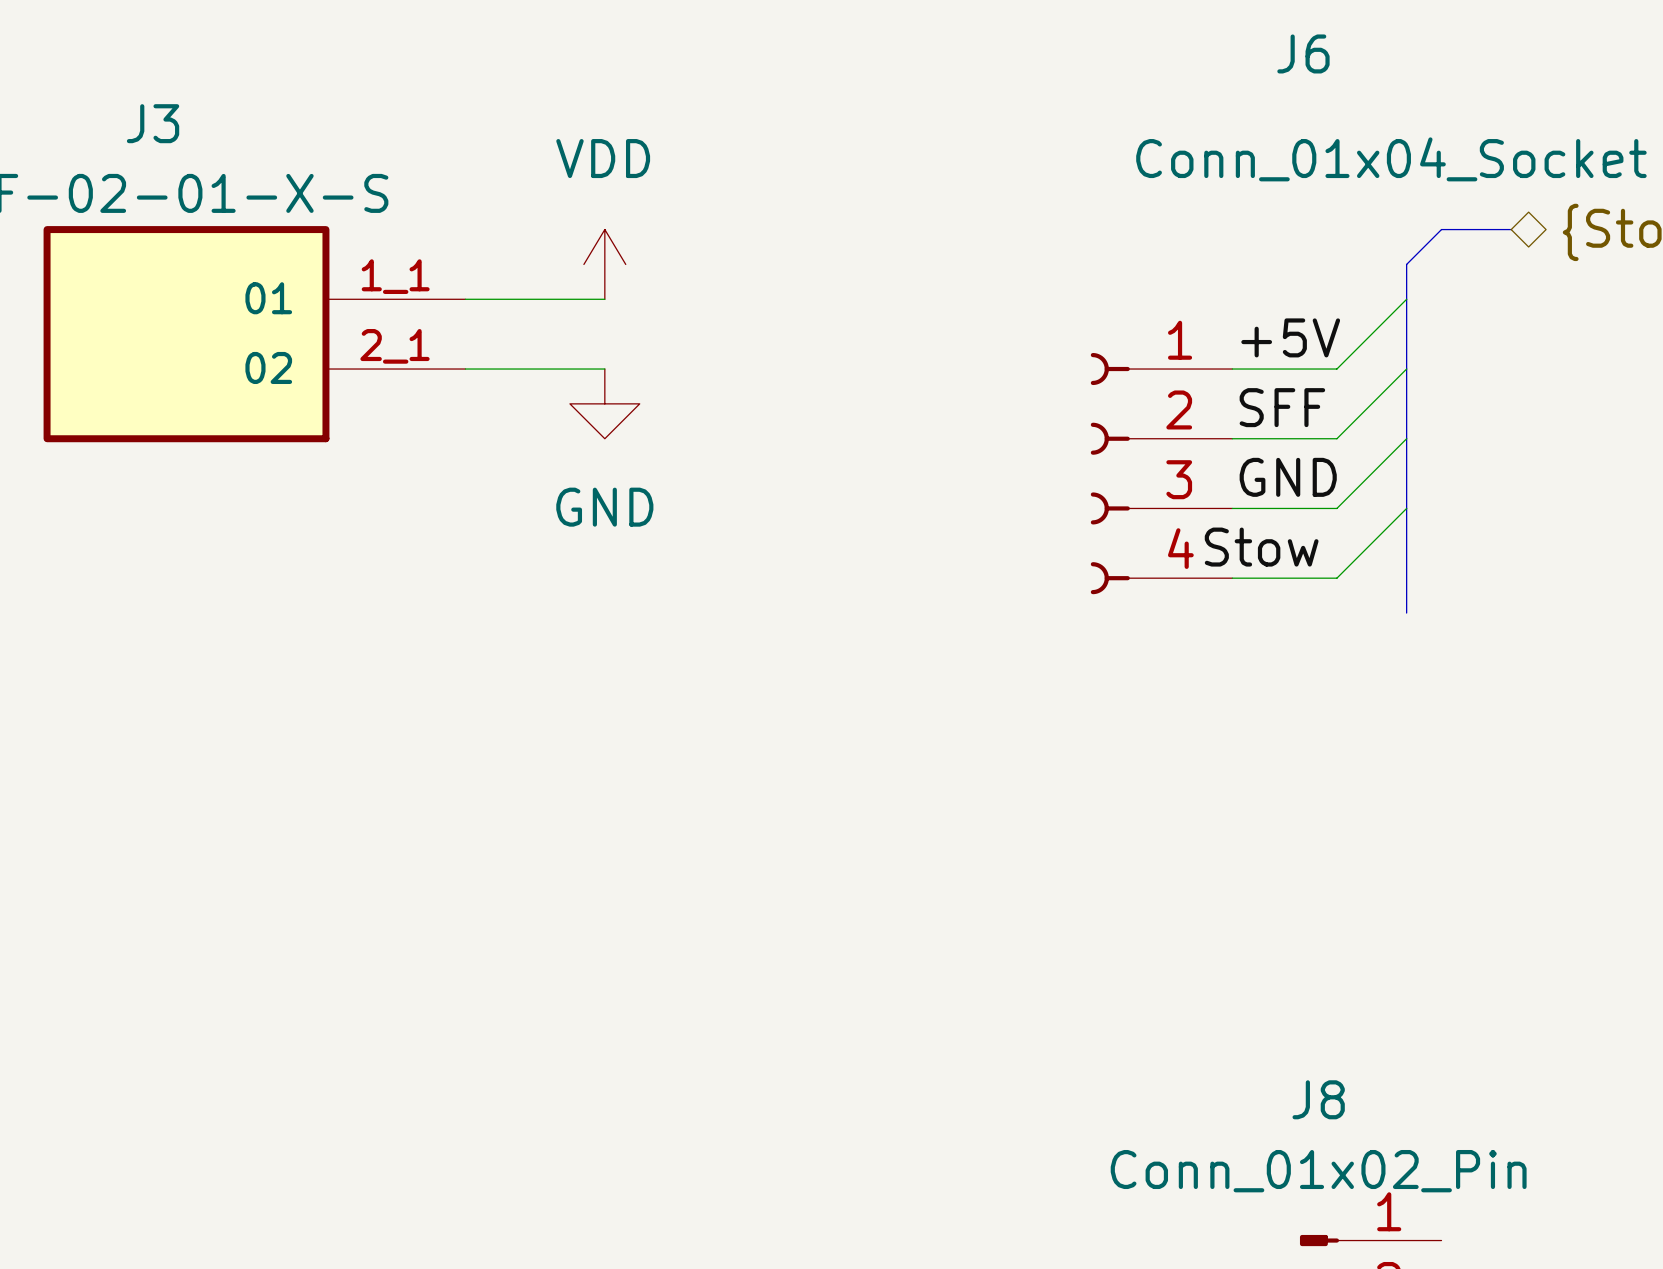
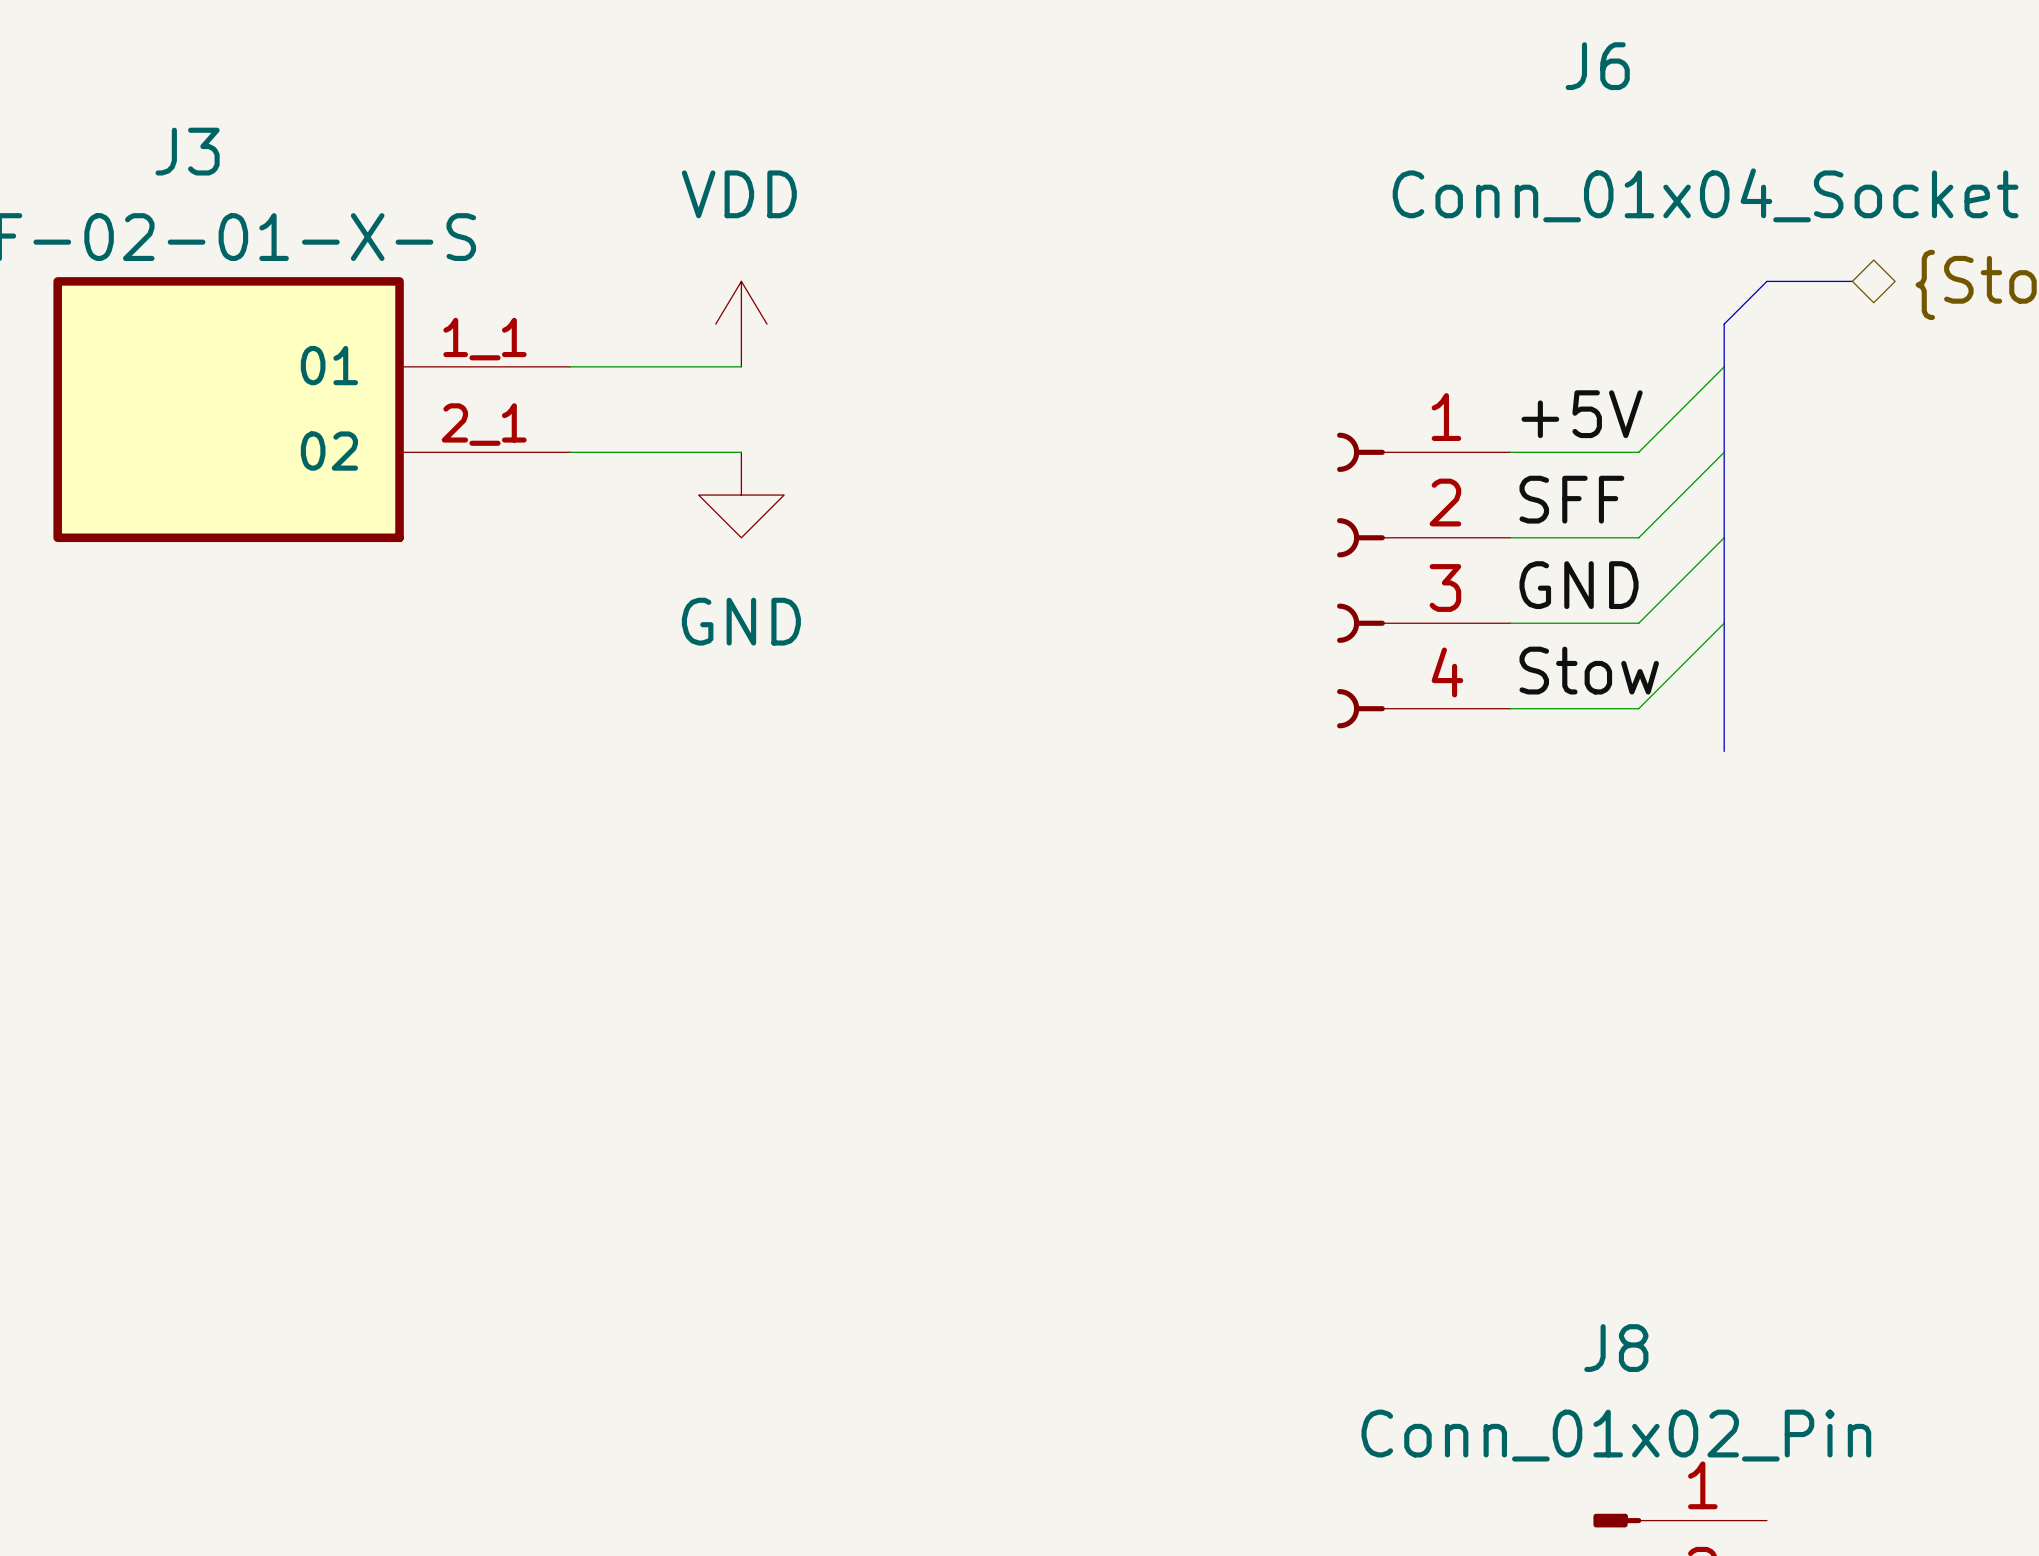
label position: Stow (1261, 547) -> Stow (1589, 670)

